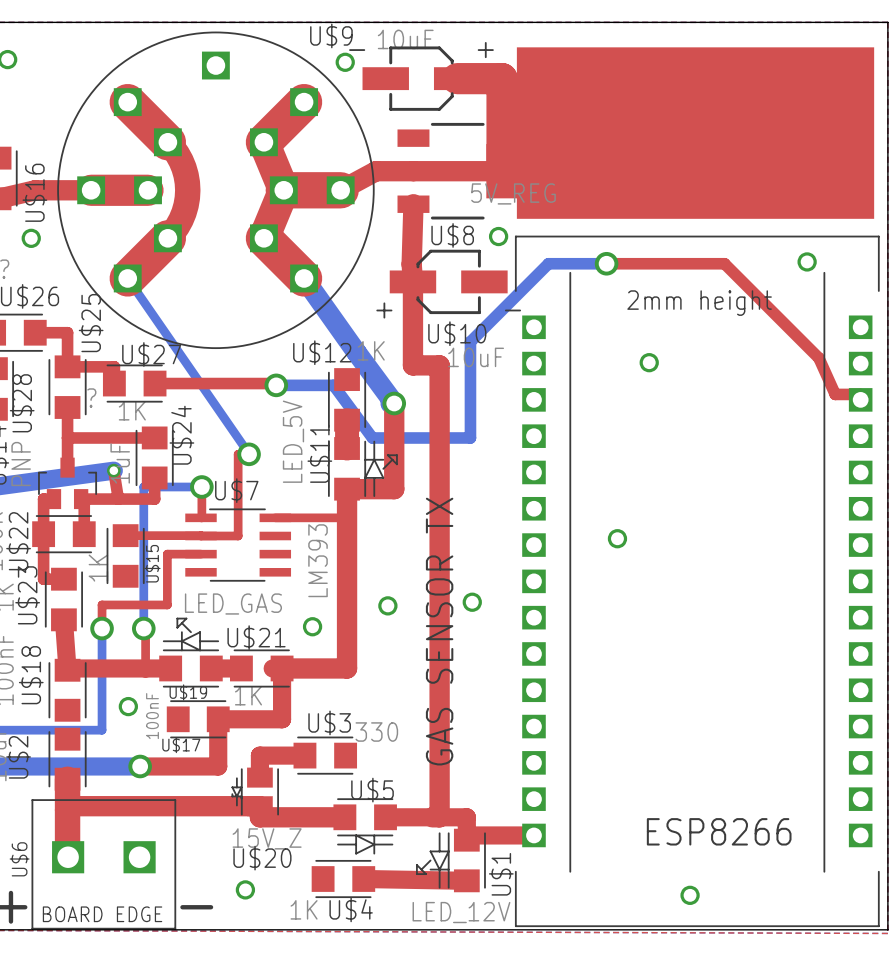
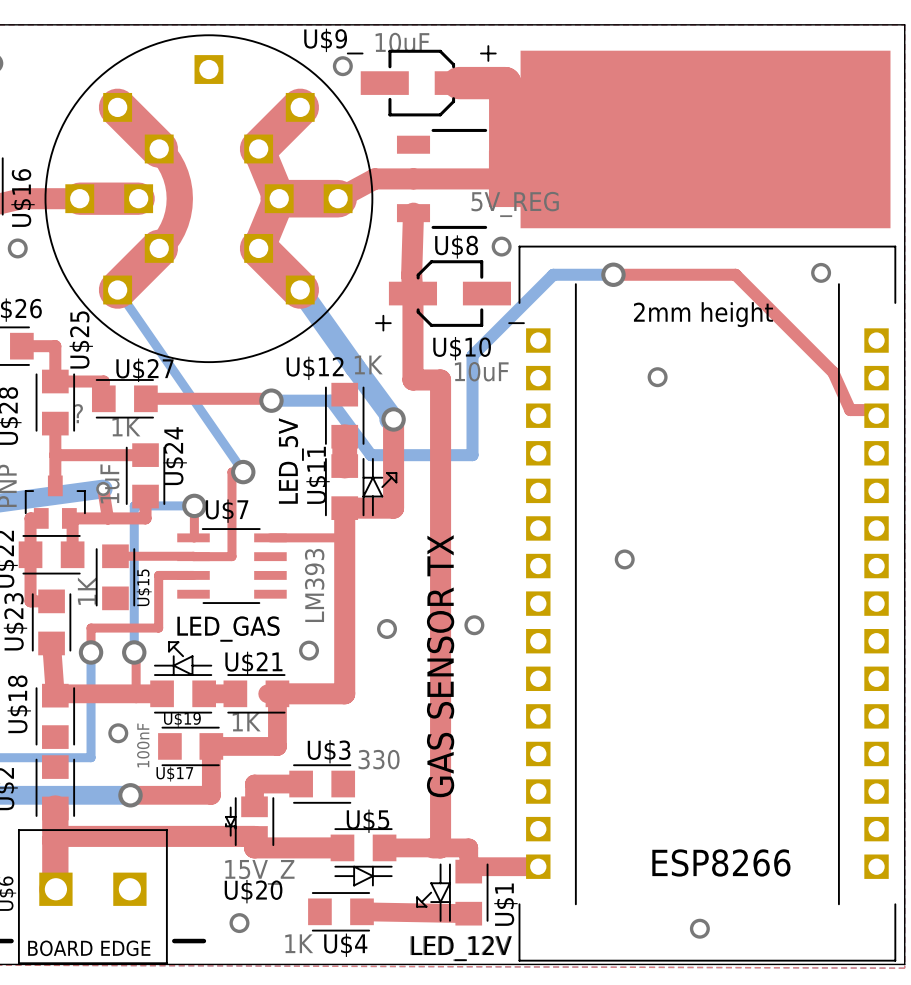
text: none -> LED_5V (291, 461)
text: none -> LED_GAS (228, 629)
text: none -> LED_12V (461, 948)

